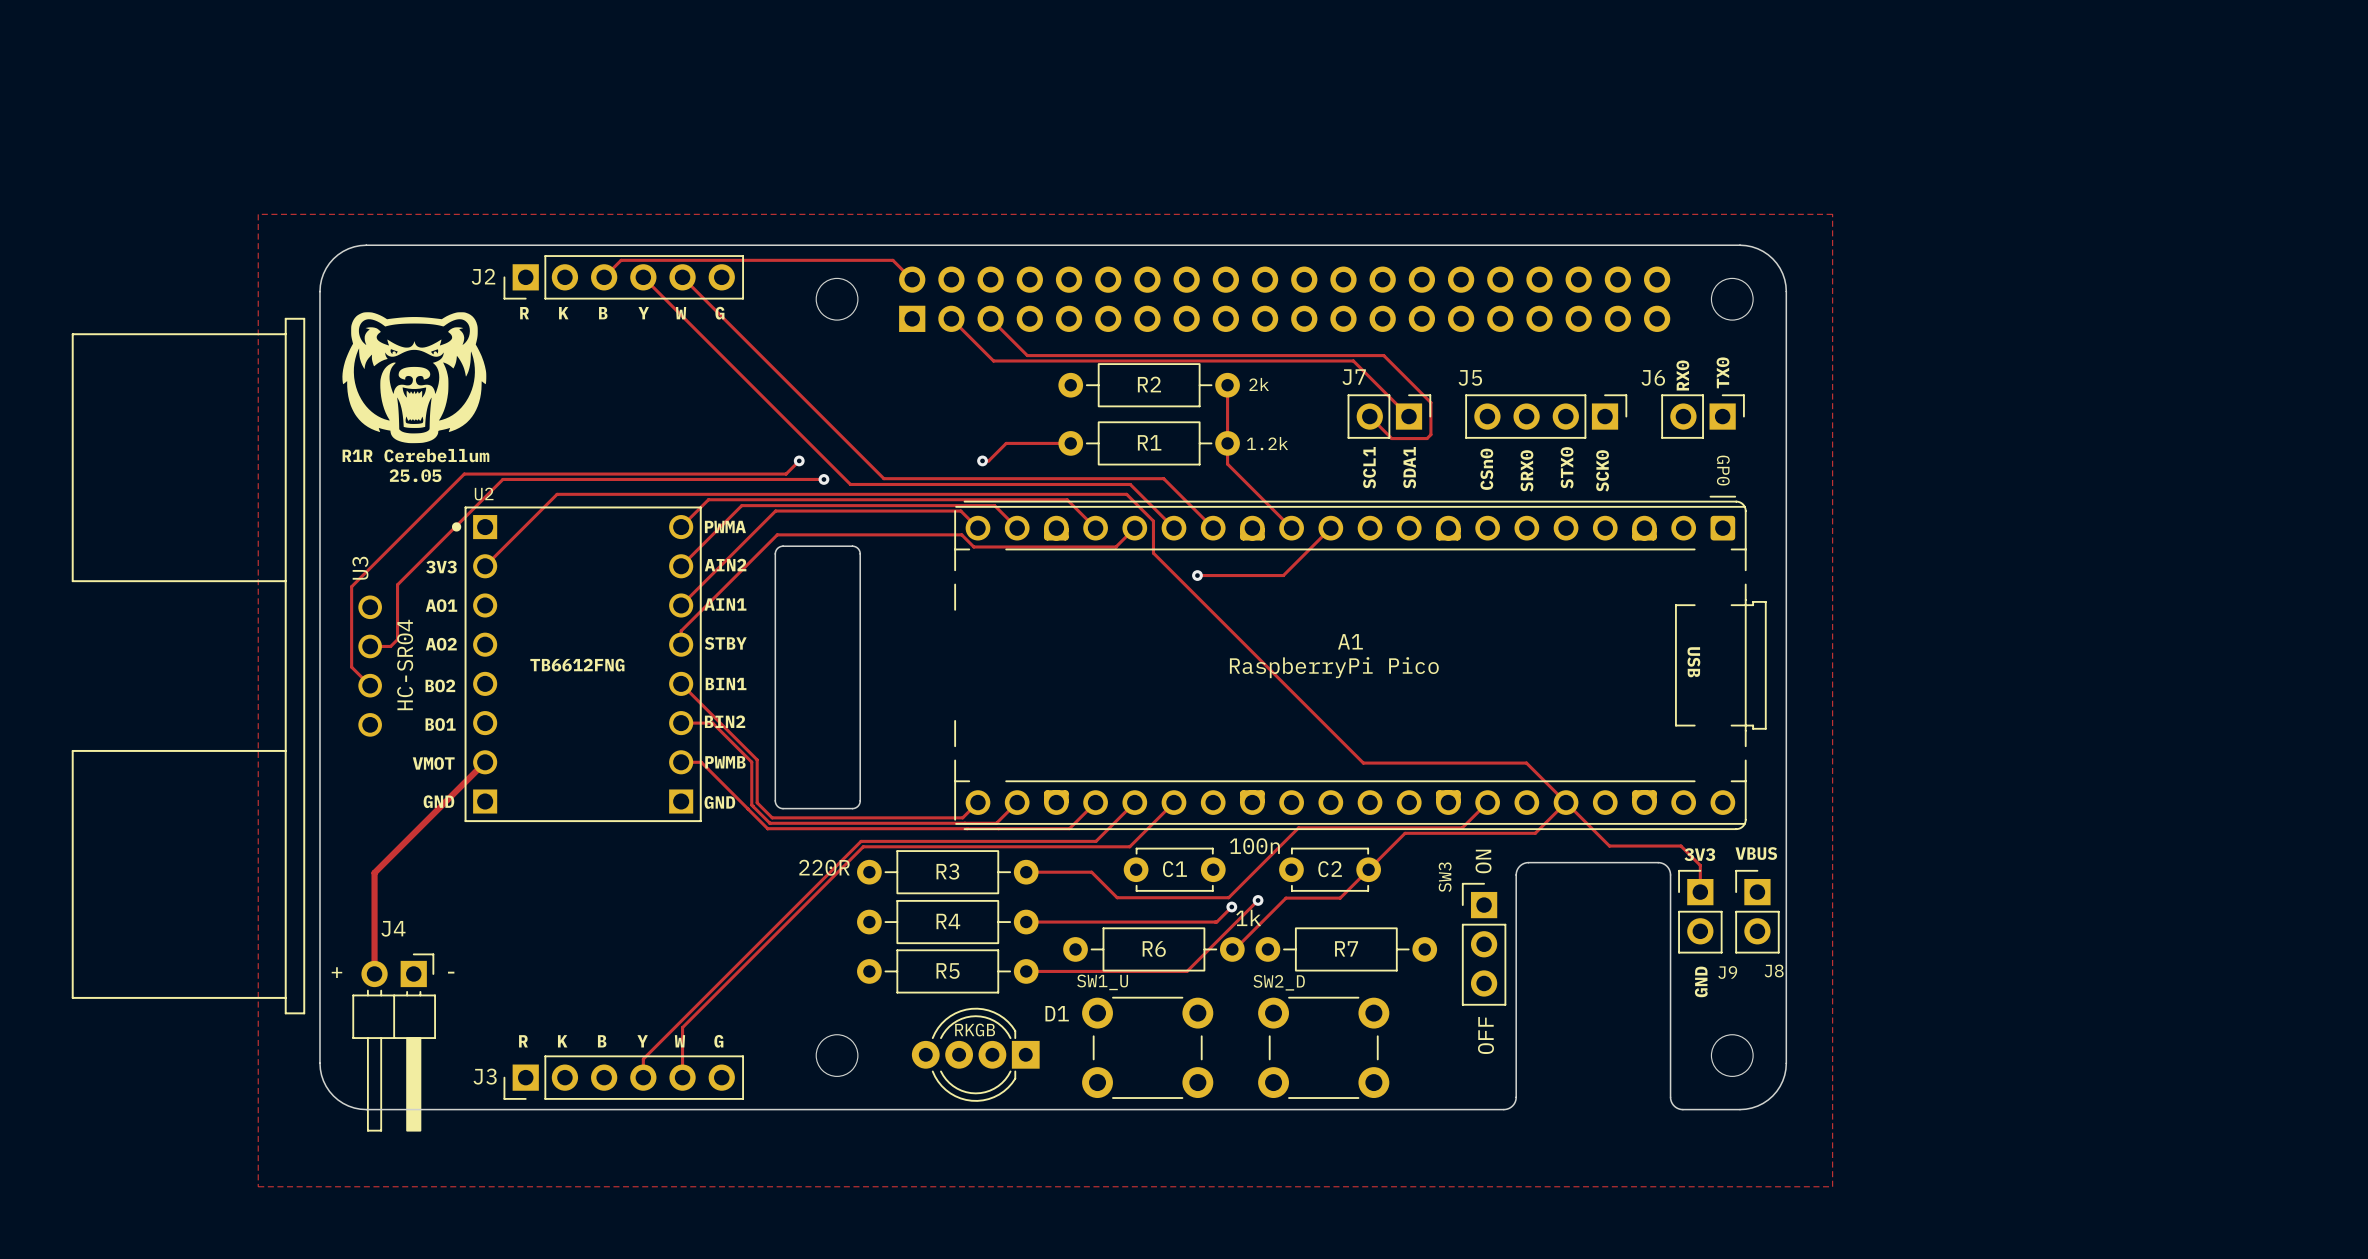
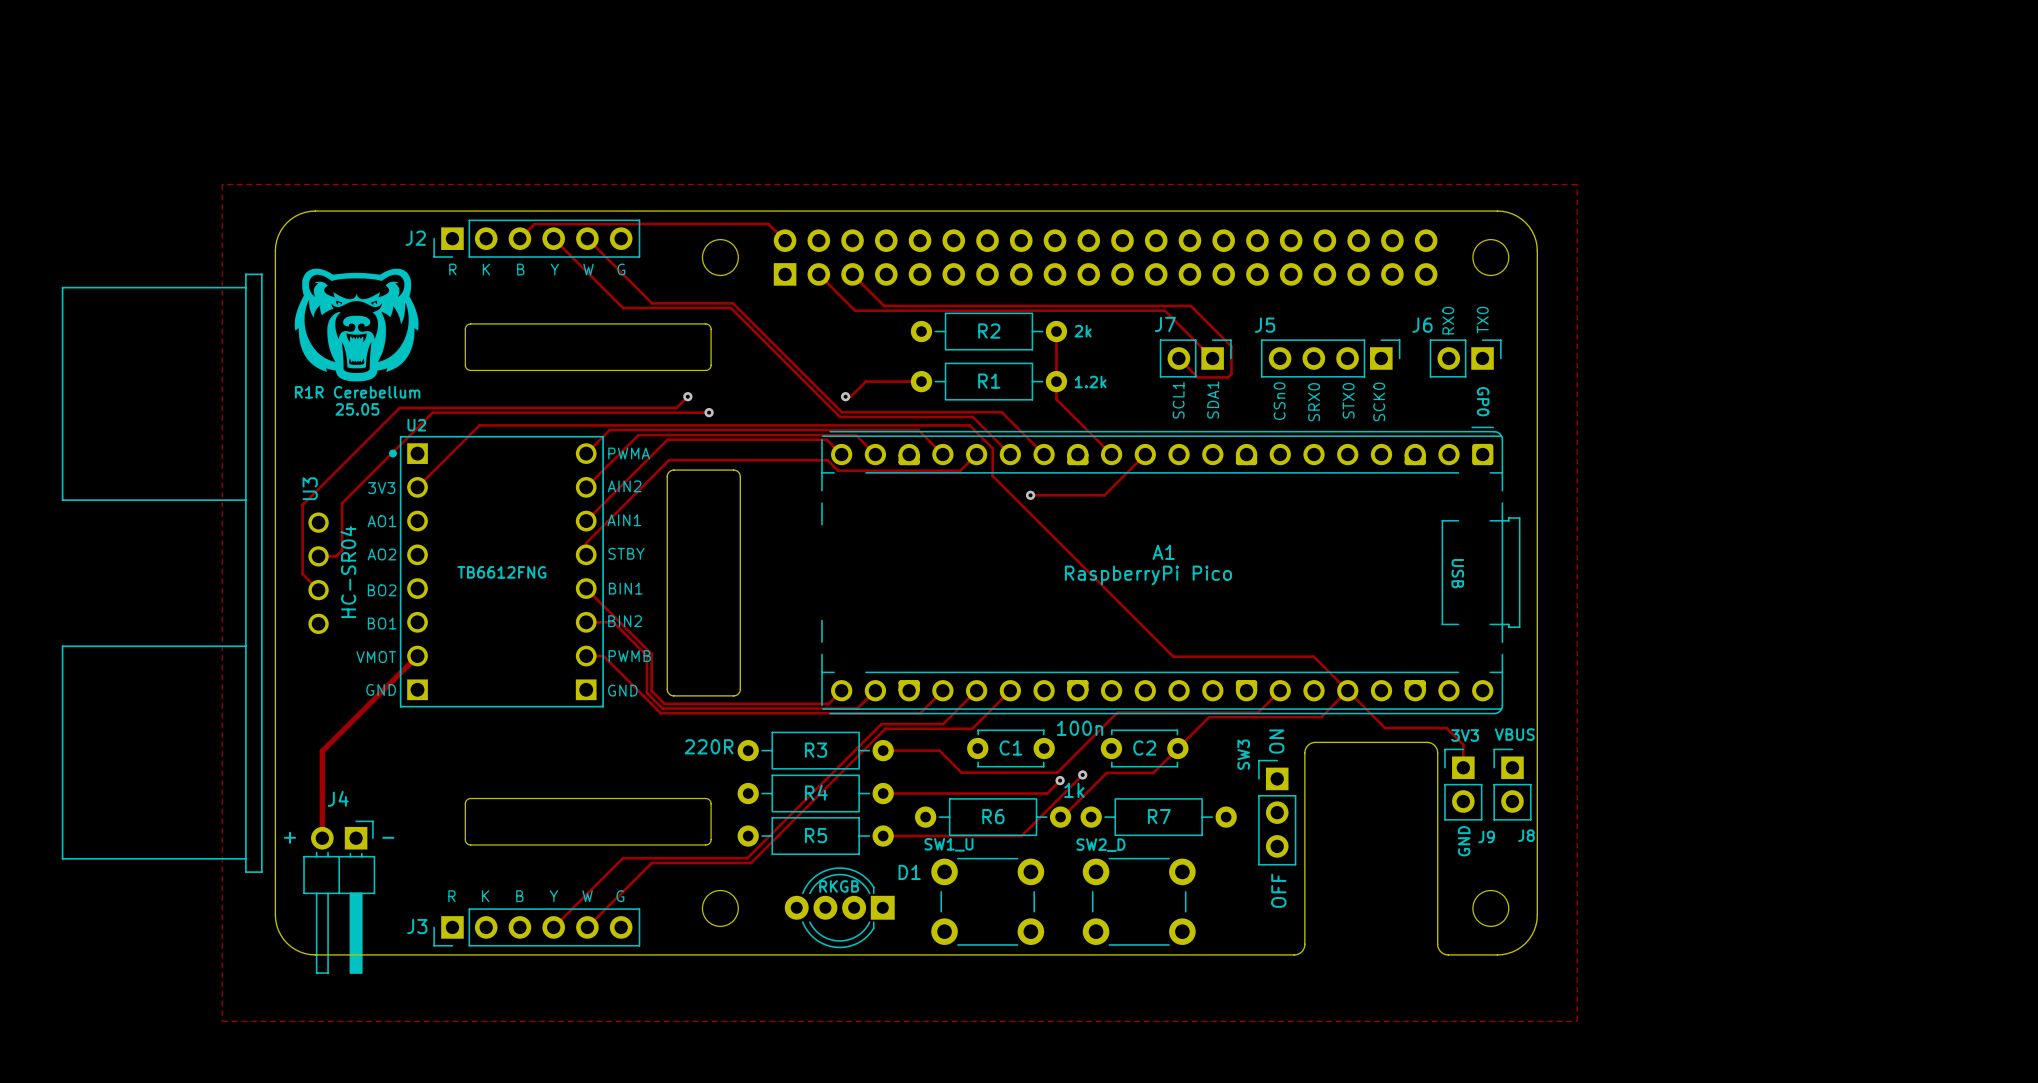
track: (757, 352) (883, 478) (1164, 479) -> (652, 303) (732, 303) (841, 412) (1001, 412)
track: (723, 357) (850, 484) (975, 484) -> (623, 308) (731, 308) (839, 416)
board edge: none -> (470, 323) (706, 324) (711, 328) (710, 366) (705, 370) (469, 370) (465, 365) (465, 329) (466, 325) (470, 323)
track: (1024, 841) (861, 841) (643, 1059) (643, 1077) -> (881, 724) (747, 858) (622, 858) (553, 927)
track: (1028, 846) (863, 846) (682, 1027) (682, 1077) -> (885, 728) (751, 862) (651, 862) (587, 927)
board edge: none -> (470, 798) (706, 798) (711, 803) (710, 840) (705, 845) (469, 844) (465, 840) (465, 803) (466, 800) (470, 798)

